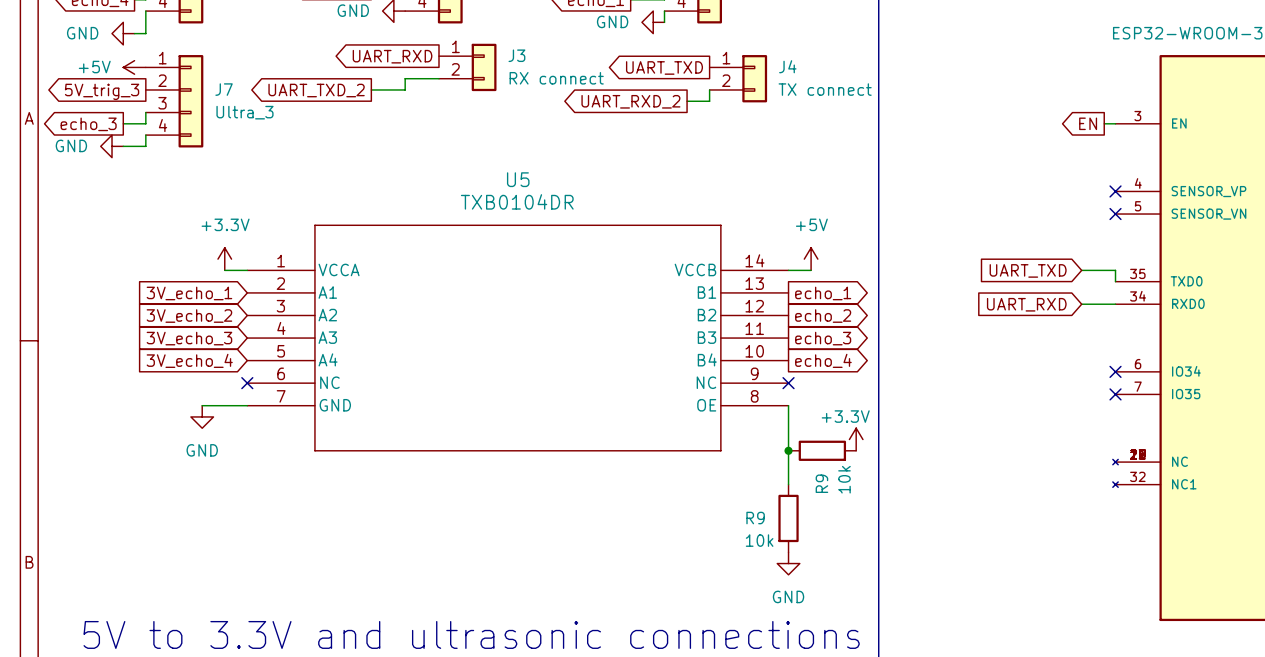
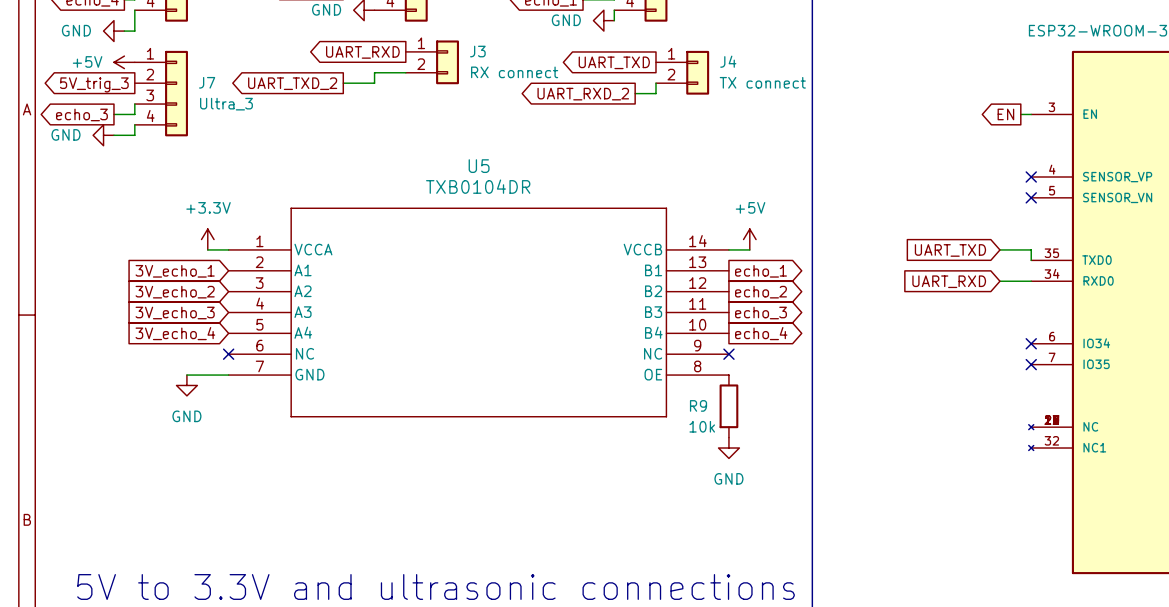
wire: (788, 405) (788, 484) -> none
power symbol: +3.3V (856, 439) -> none
junction: (788, 450) -> none
R9 rotation: 0° (822, 450) -> 90° clockwise (728, 406)
R9: 10k (788, 518) -> none
power symbol position: GND (788, 563) -> GND (728, 448)

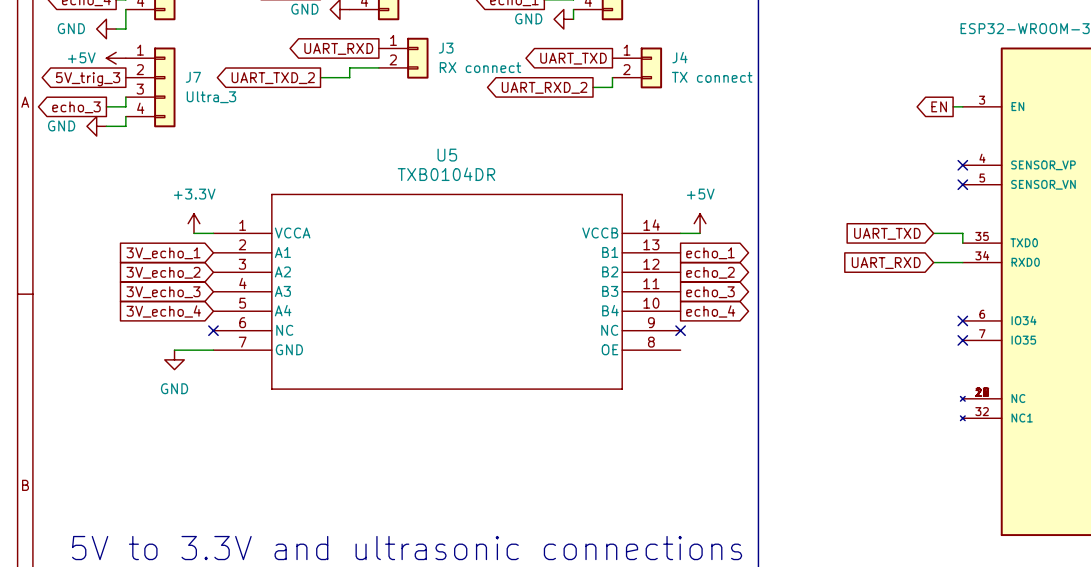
R9: 10k (728, 406) -> none
power symbol: GND (728, 448) -> none

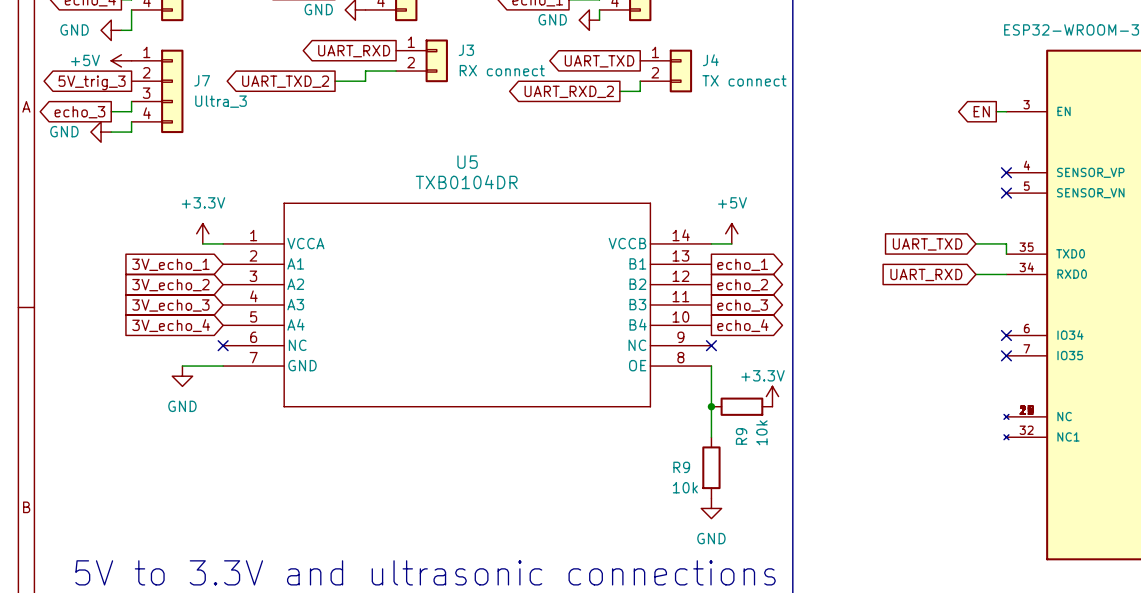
wire: none -> (711, 366) (711, 437)
power symbol: none -> +3.3V (772, 396)
junction: none -> (711, 406)
R9: none -> 10k (741, 406)
R9: none -> 10k (711, 467)
power symbol: none -> GND (711, 508)

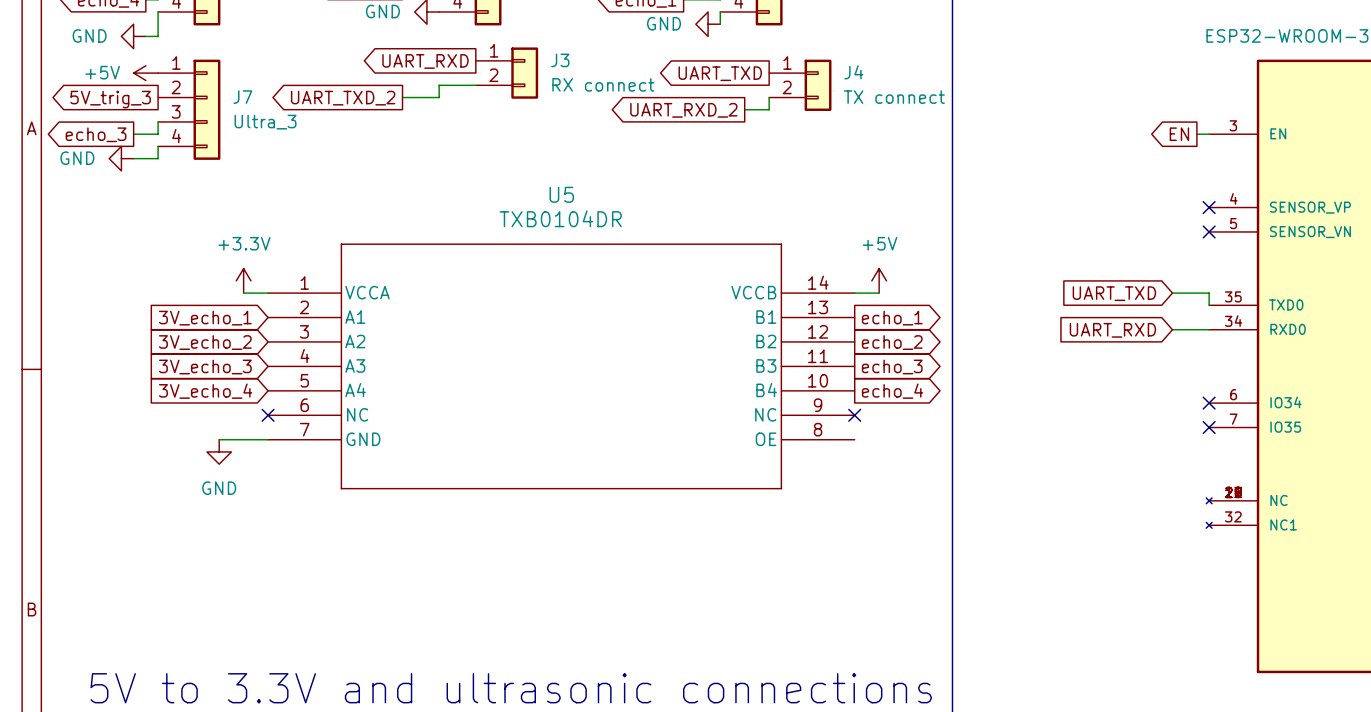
wire: (711, 366) (711, 437) -> none
power symbol: +3.3V (772, 396) -> none
junction: (711, 406) -> none
R9: 10k (741, 406) -> none
R9: 10k (711, 467) -> none
power symbol: GND (711, 508) -> none

